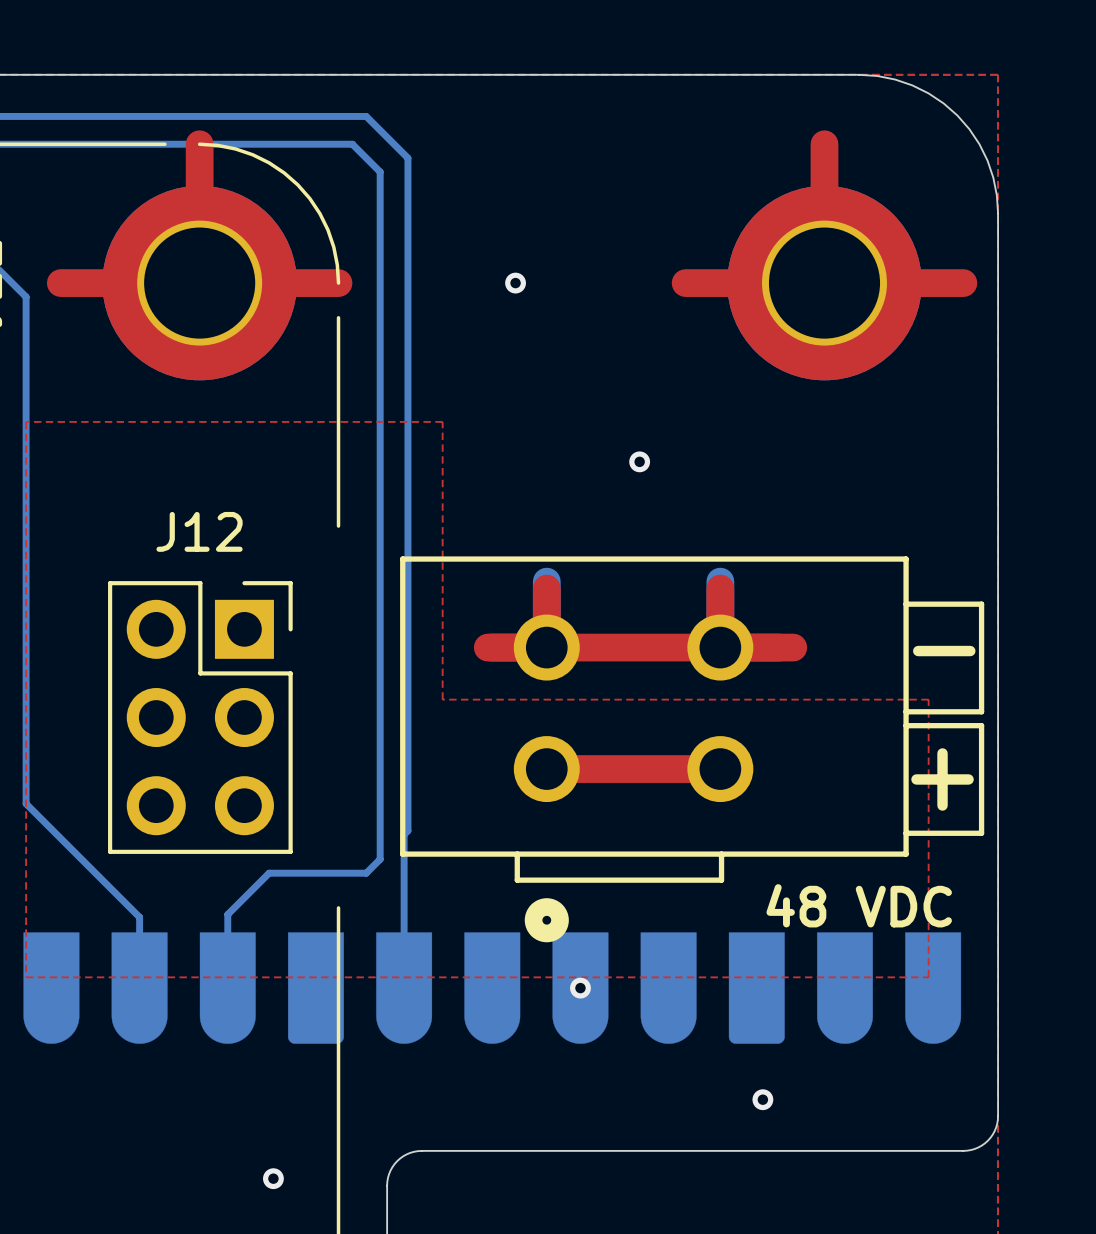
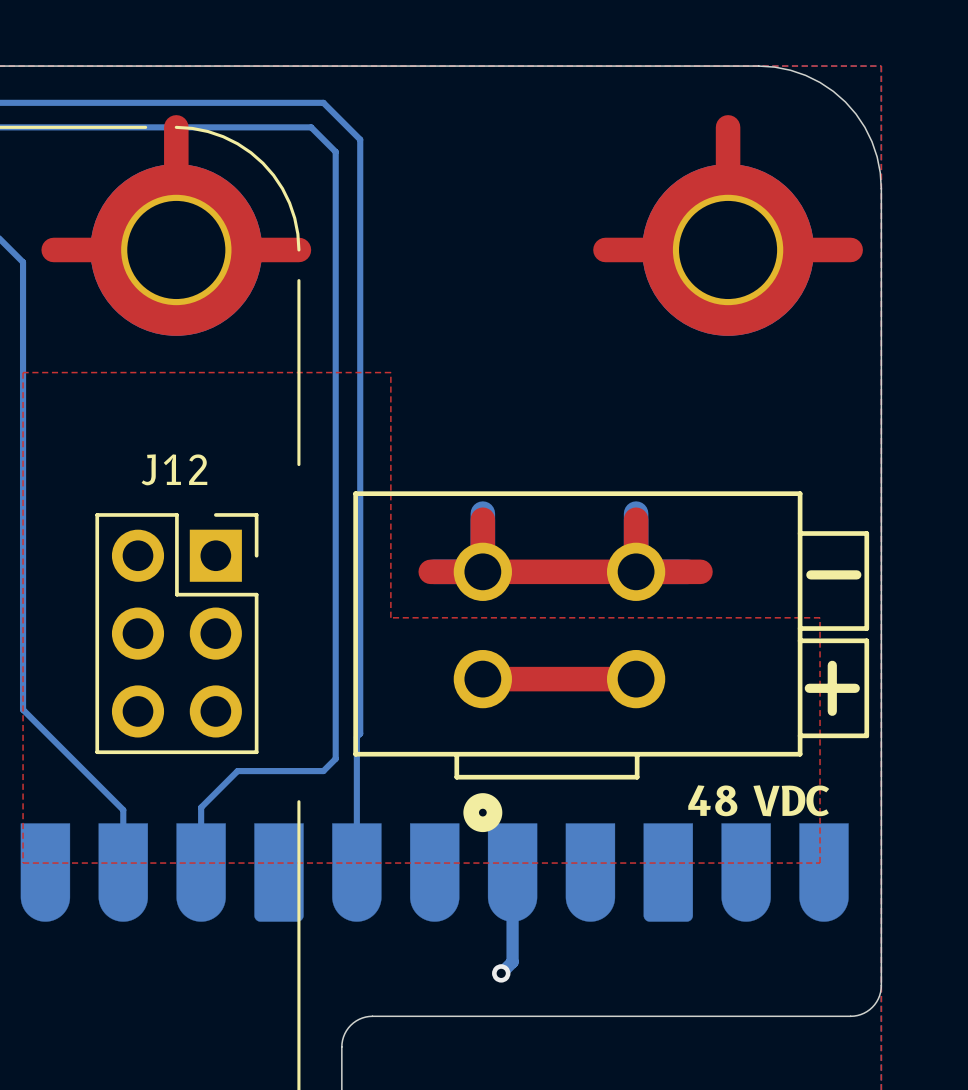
via: (515, 283) -> none
via: (639, 461) -> none
bottom track: none -> (512, 872) (512, 962) (501, 973)
via: (580, 988) -> none
via: (762, 1099) -> none
via: none -> (501, 973)
via: (273, 1178) -> none

